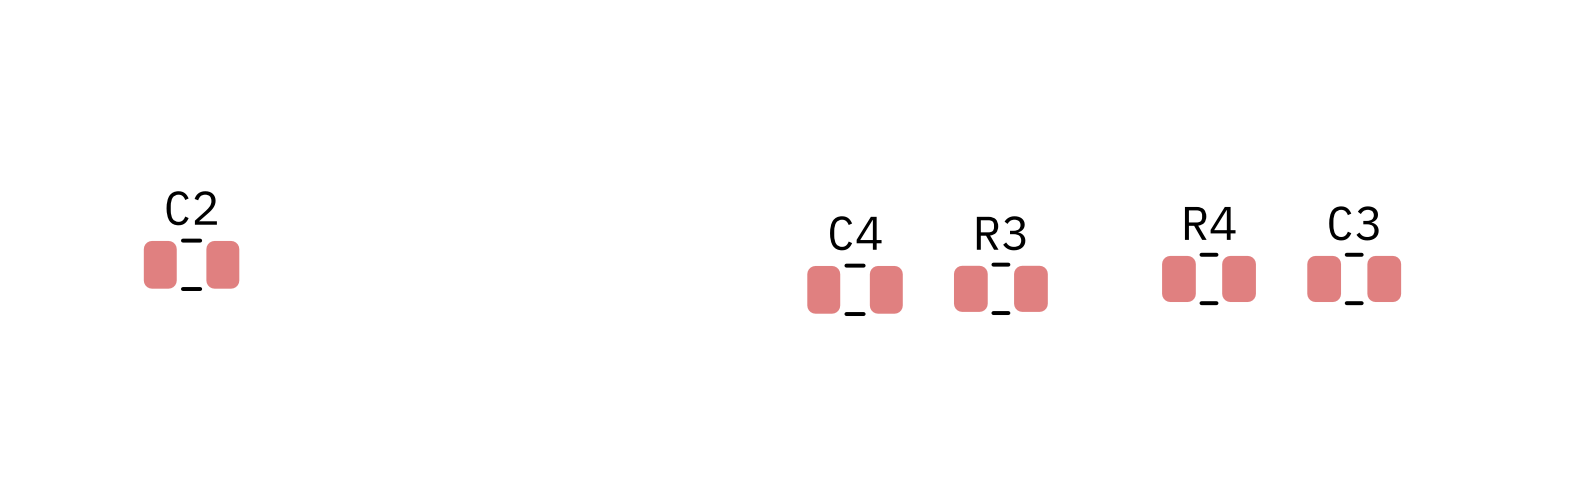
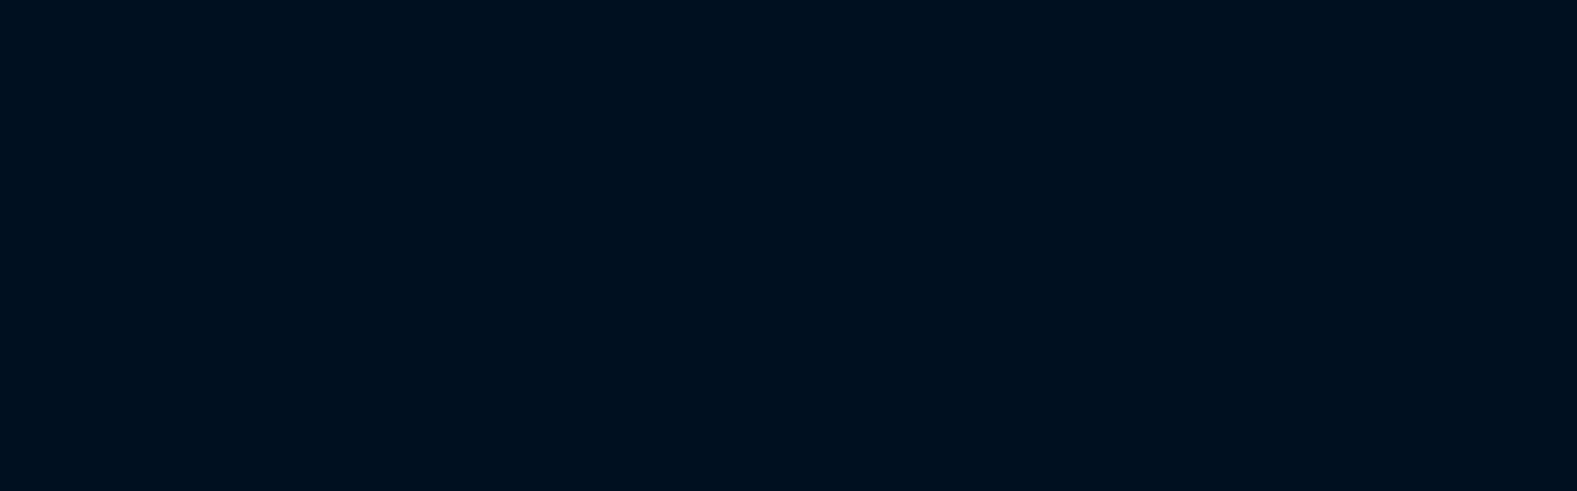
C2: (191, 264) -> none
R4: (1209, 278) -> none
C3: (1354, 278) -> none
R3: (1000, 288) -> none
C4: (855, 289) -> none

